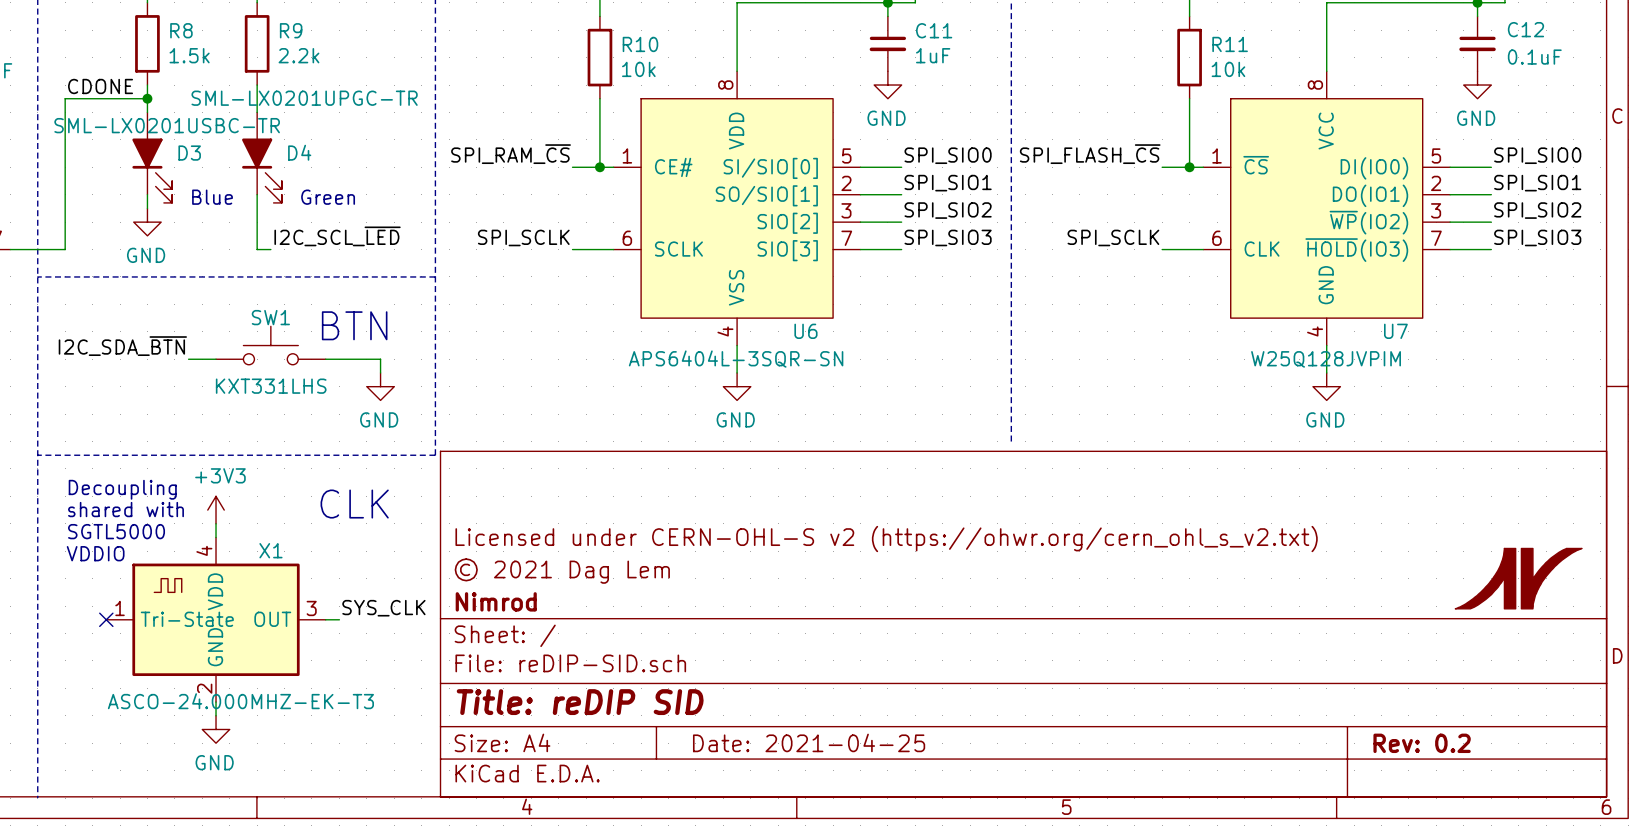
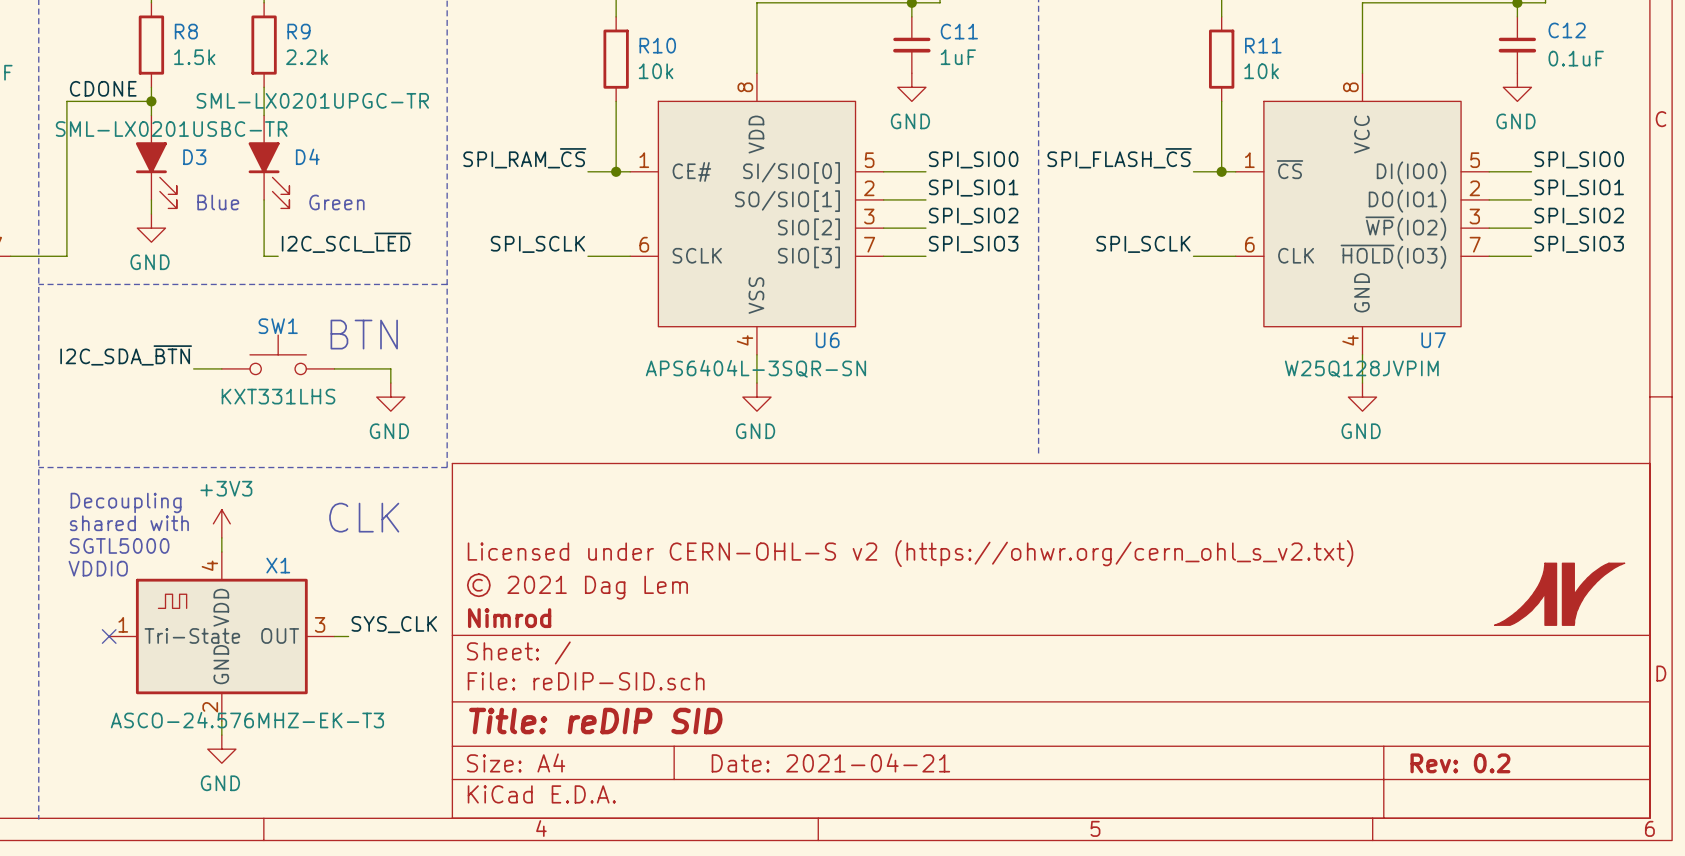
X1 value: ASCO-24.000MHZ-EK-T3 (240, 701) -> ASCO-24.576MHZ-EK-T3 (247, 720)
title block: Date: 2021-04-25 (809, 742) -> Date: 2021-04-21 (830, 762)

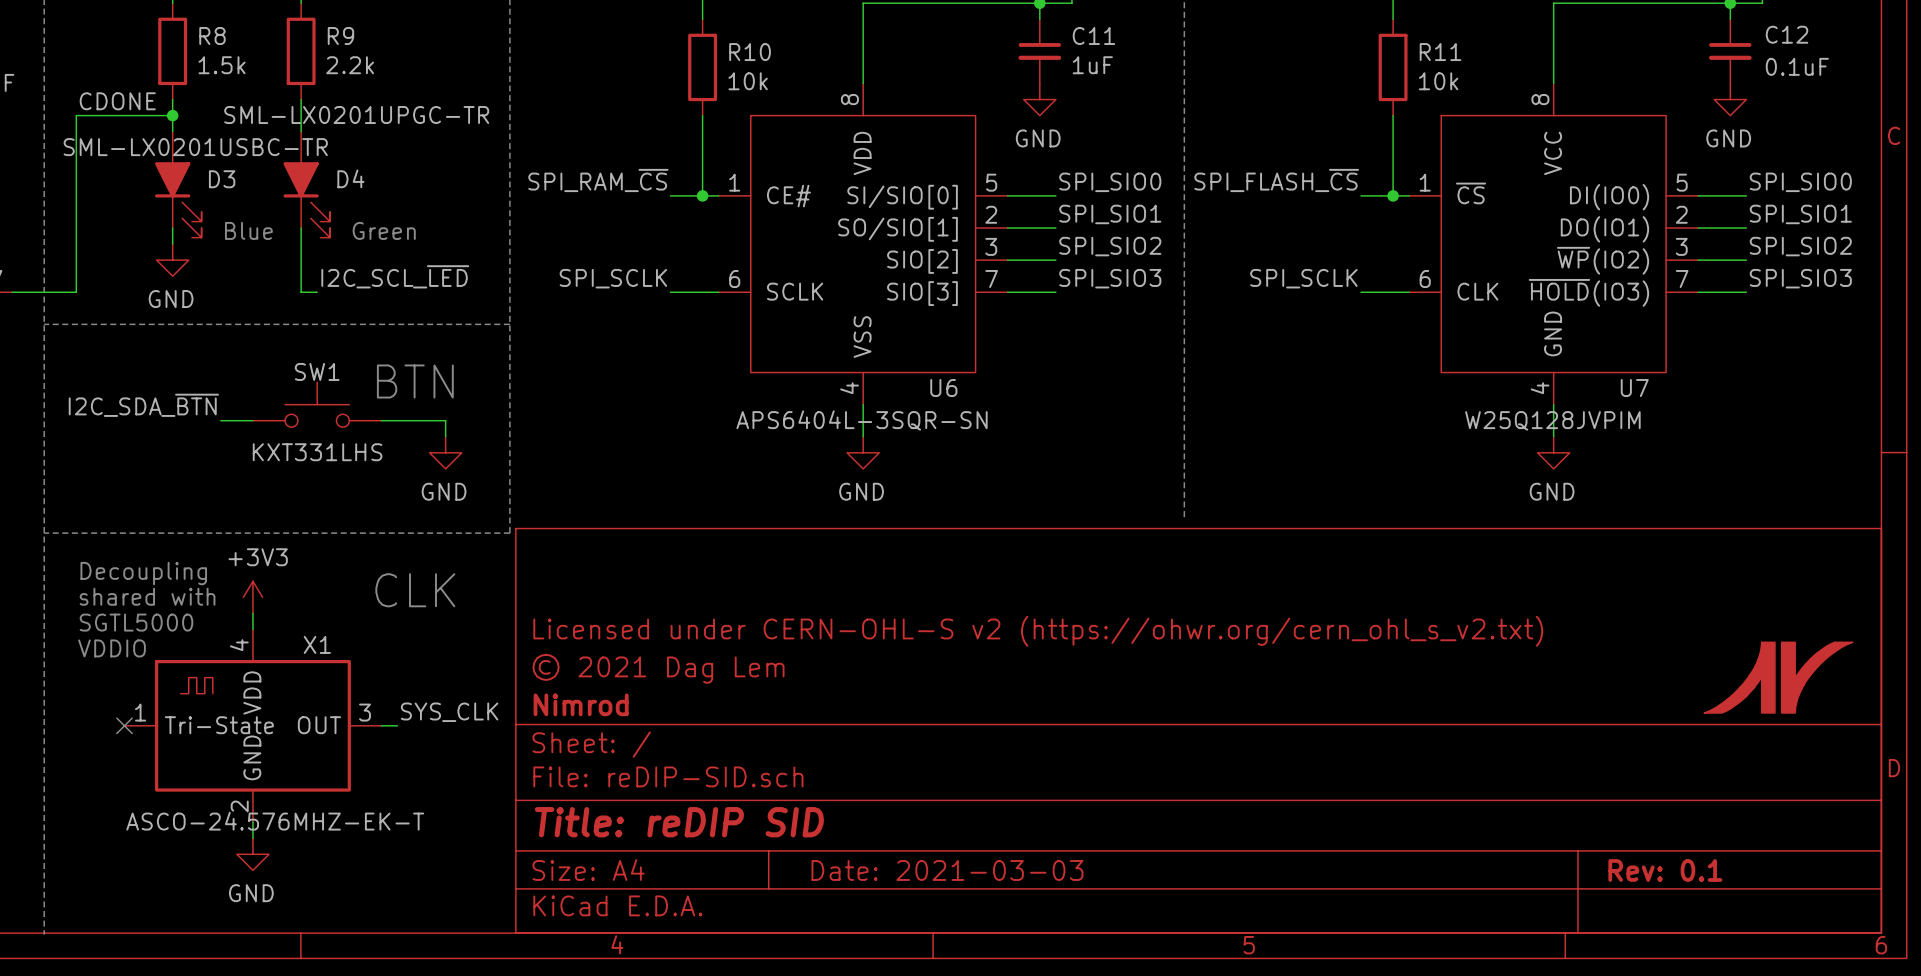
X1 value: ASCO-24.576MHZ-EK-T3 (247, 720) -> ASCO-24.576MHZ-EK-T (275, 821)
title block: Date: 2021-04-21 (830, 762) -> Date: 2021-03-03 (947, 870)
title block: Rev: 0.2 (1460, 763) -> Rev: 0.1 (1665, 870)

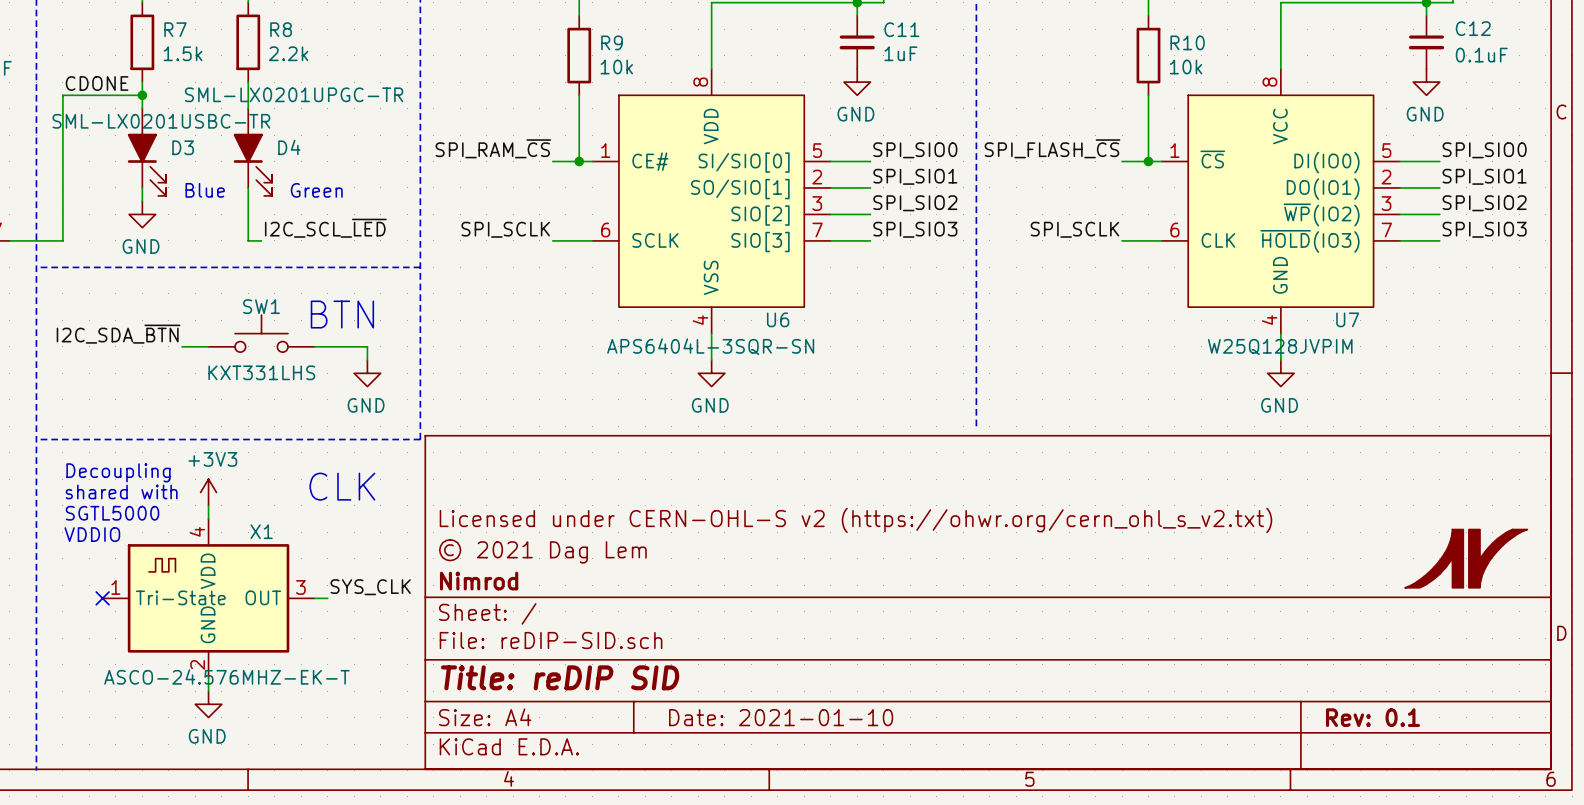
R8 name: R8 (212, 36) -> R7 (175, 29)
R9 name: R9 (340, 36) -> R8 (281, 29)
R10 name: R10 (750, 52) -> R9 (612, 42)
R11 name: R11 (1440, 52) -> R10 (1187, 42)
title block: Date: 2021-03-03 (947, 870) -> Date: 2021-01-10 (781, 717)

